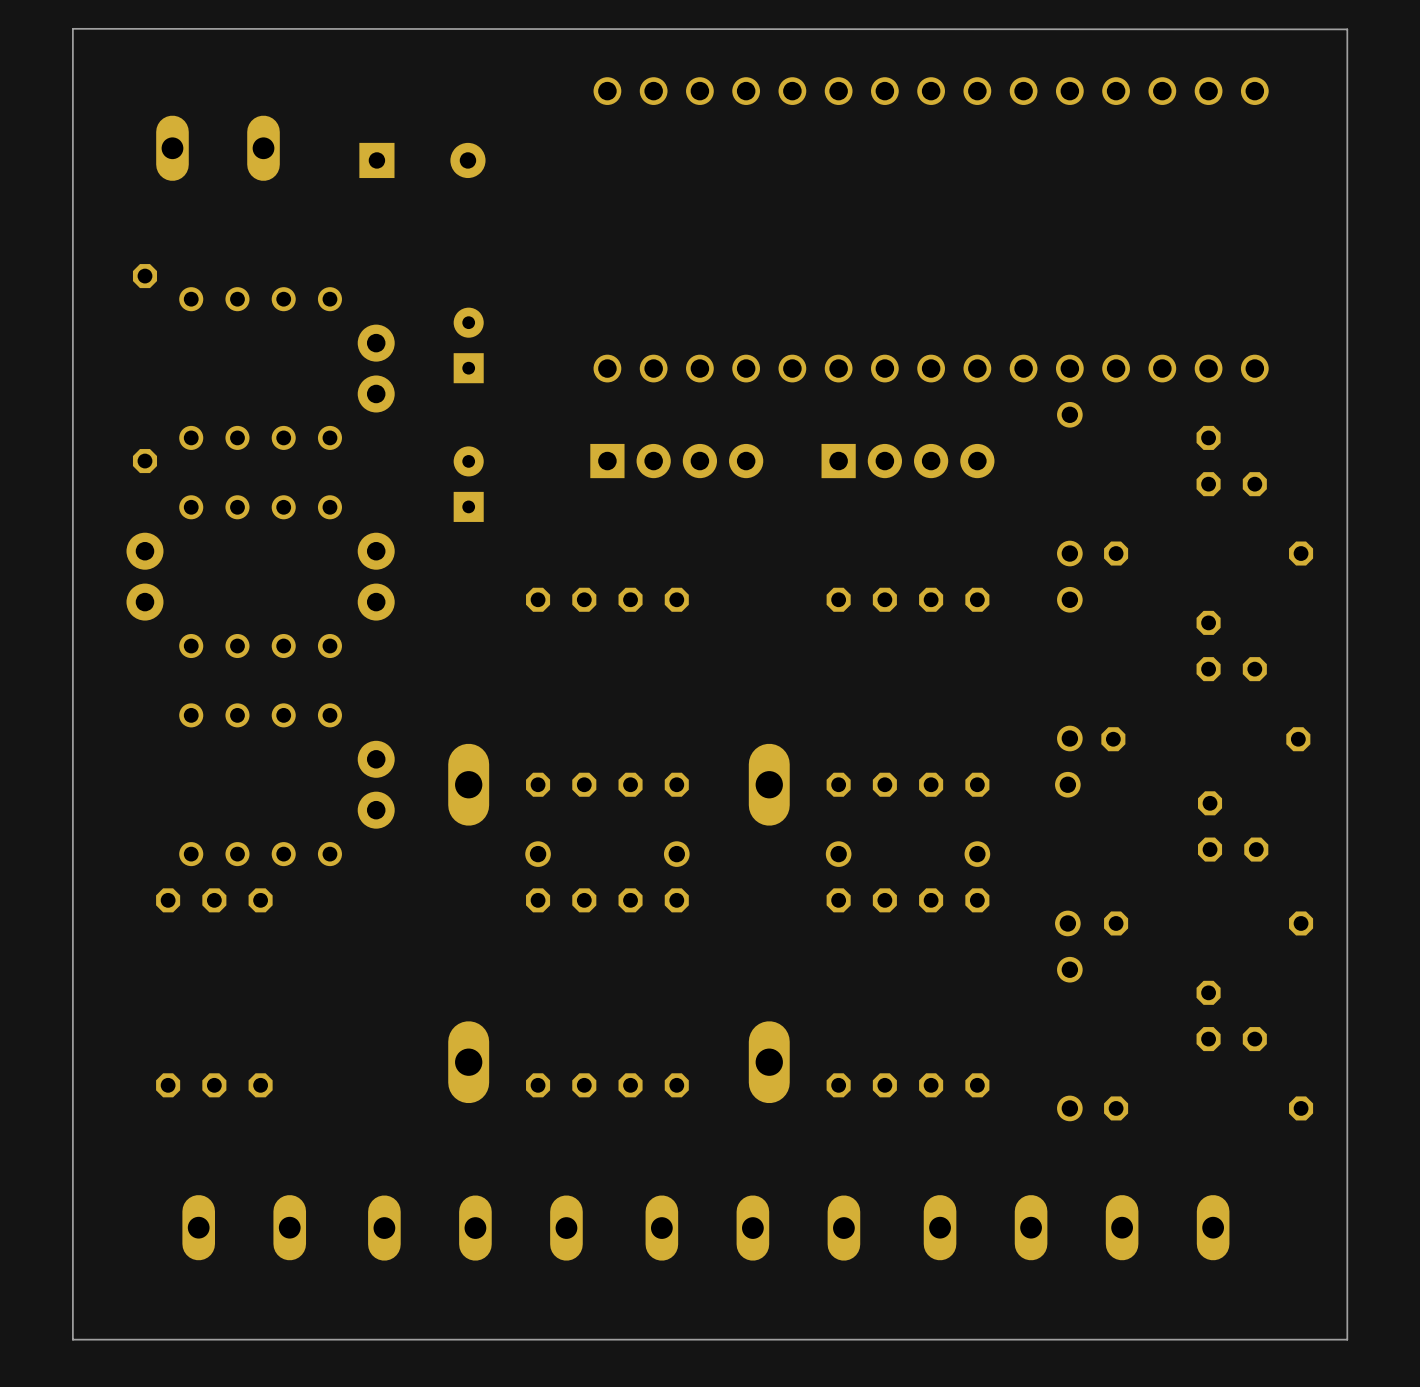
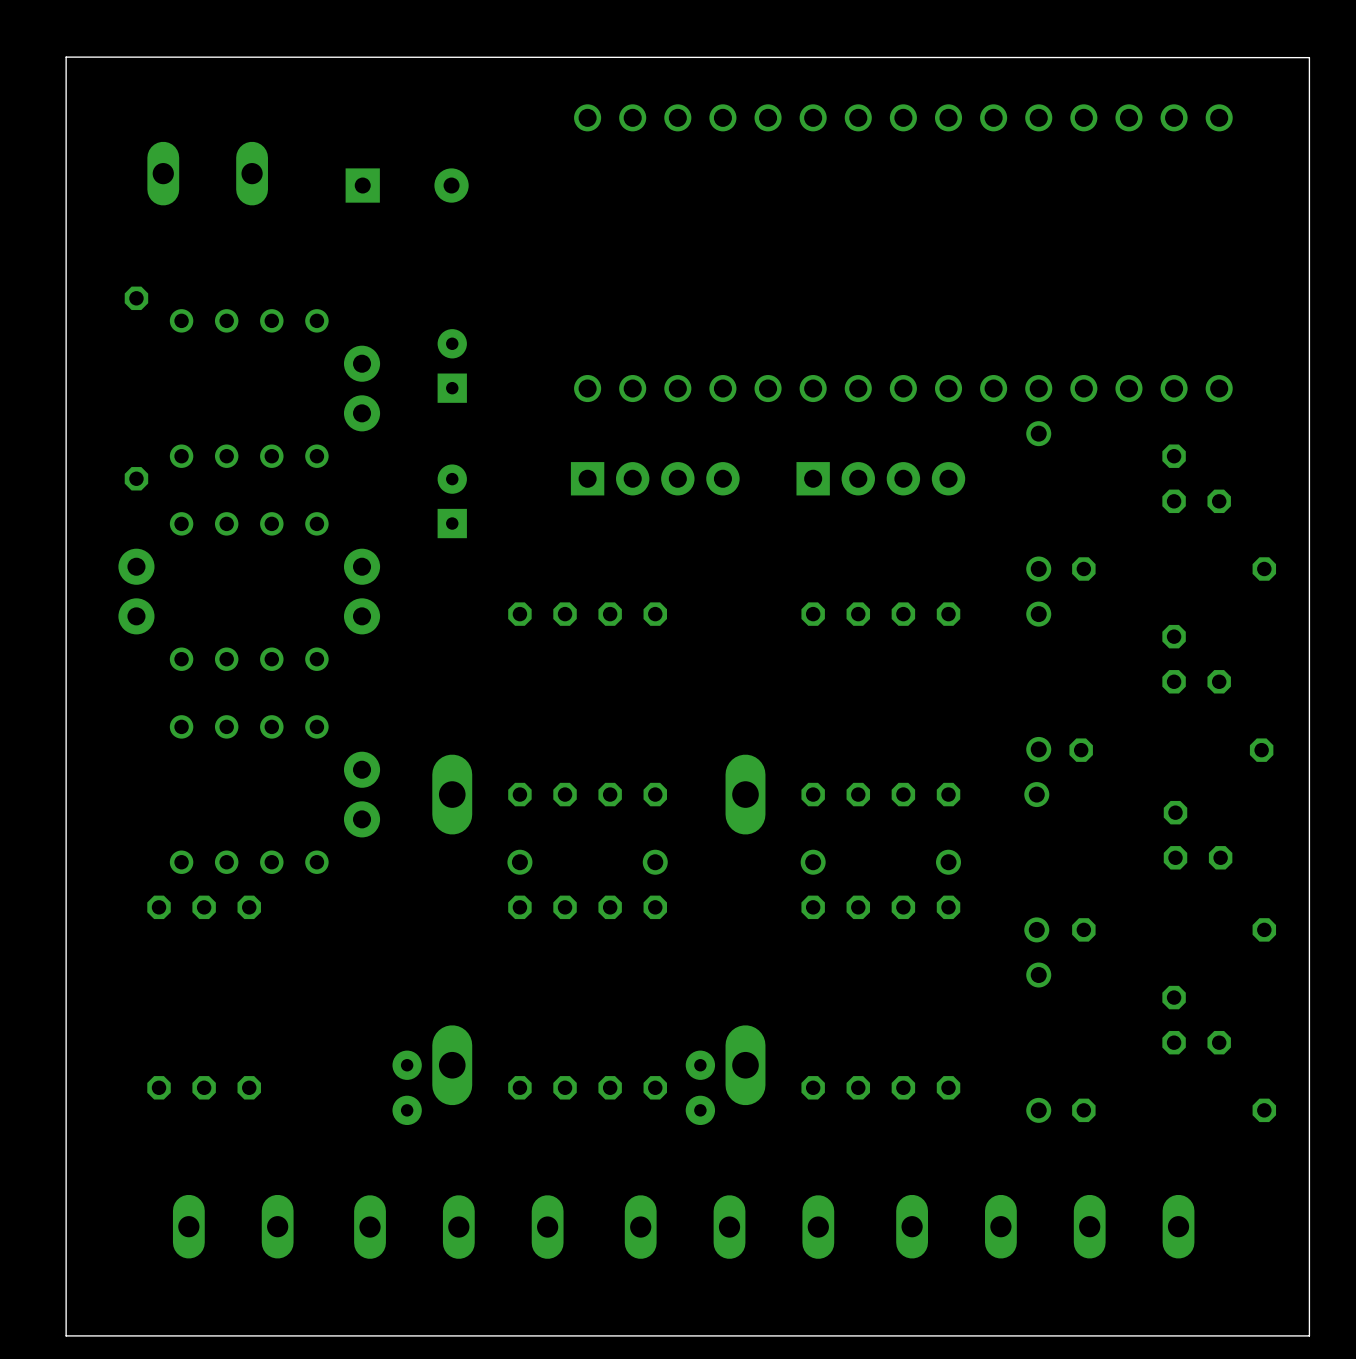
part: none -> (407, 1087)
part: none -> (700, 1087)

